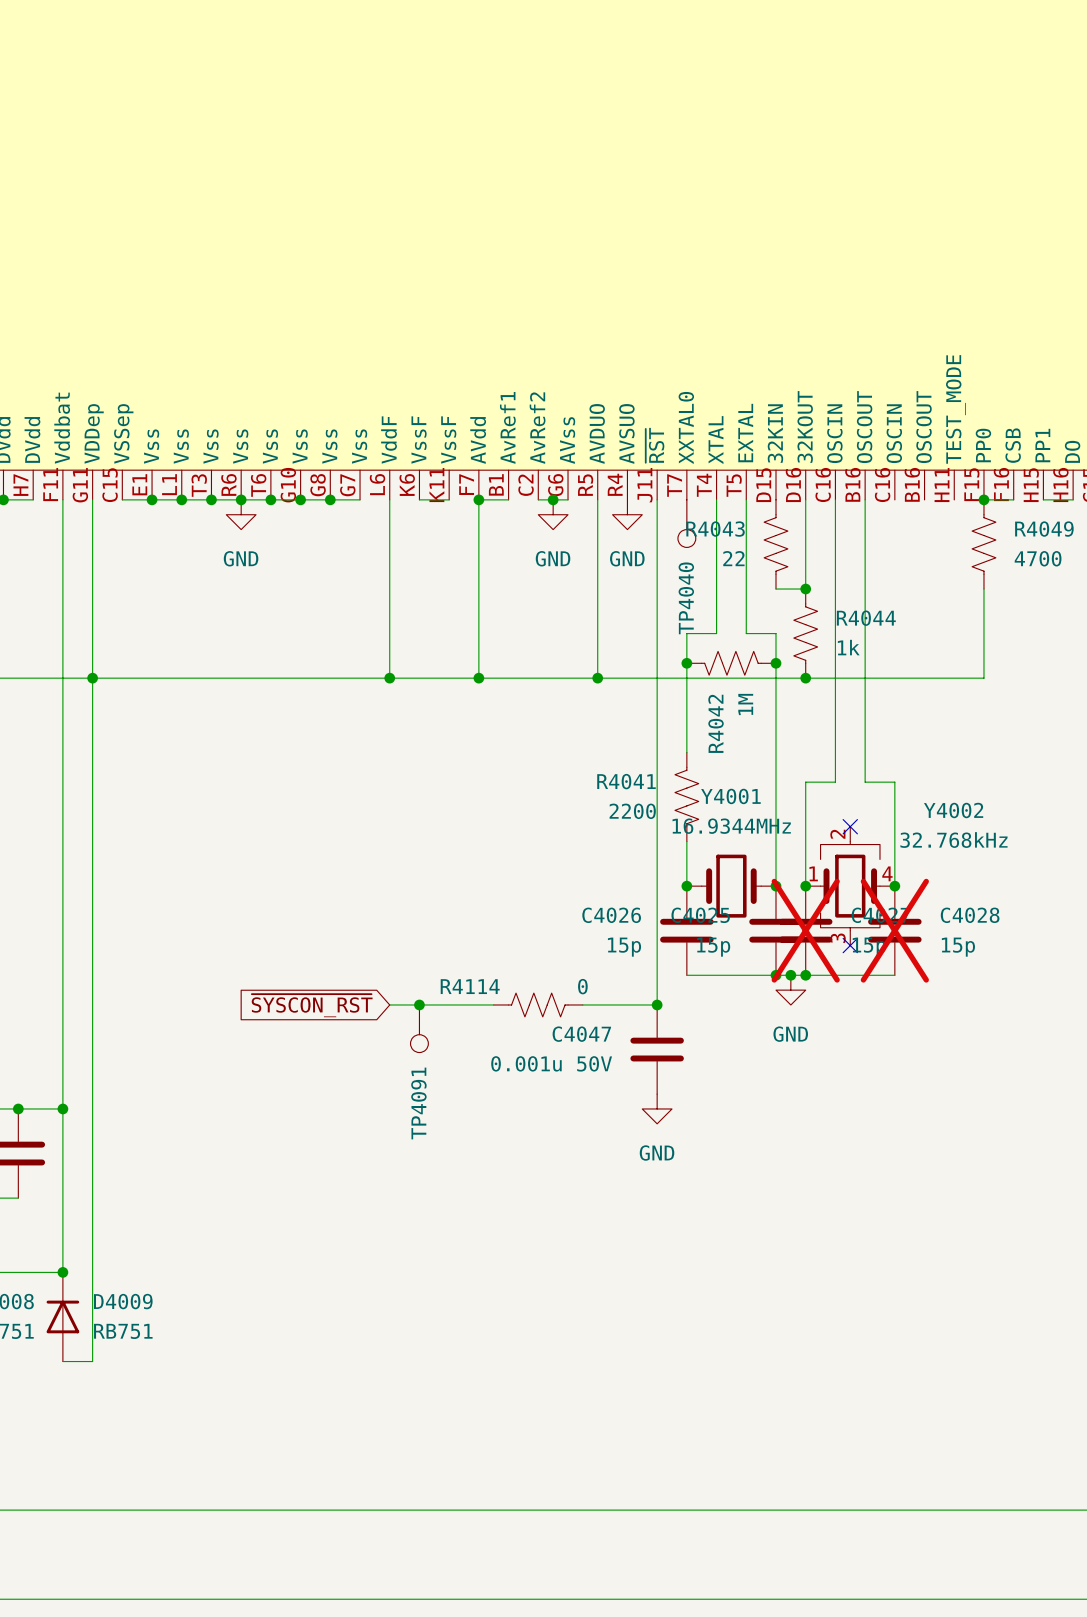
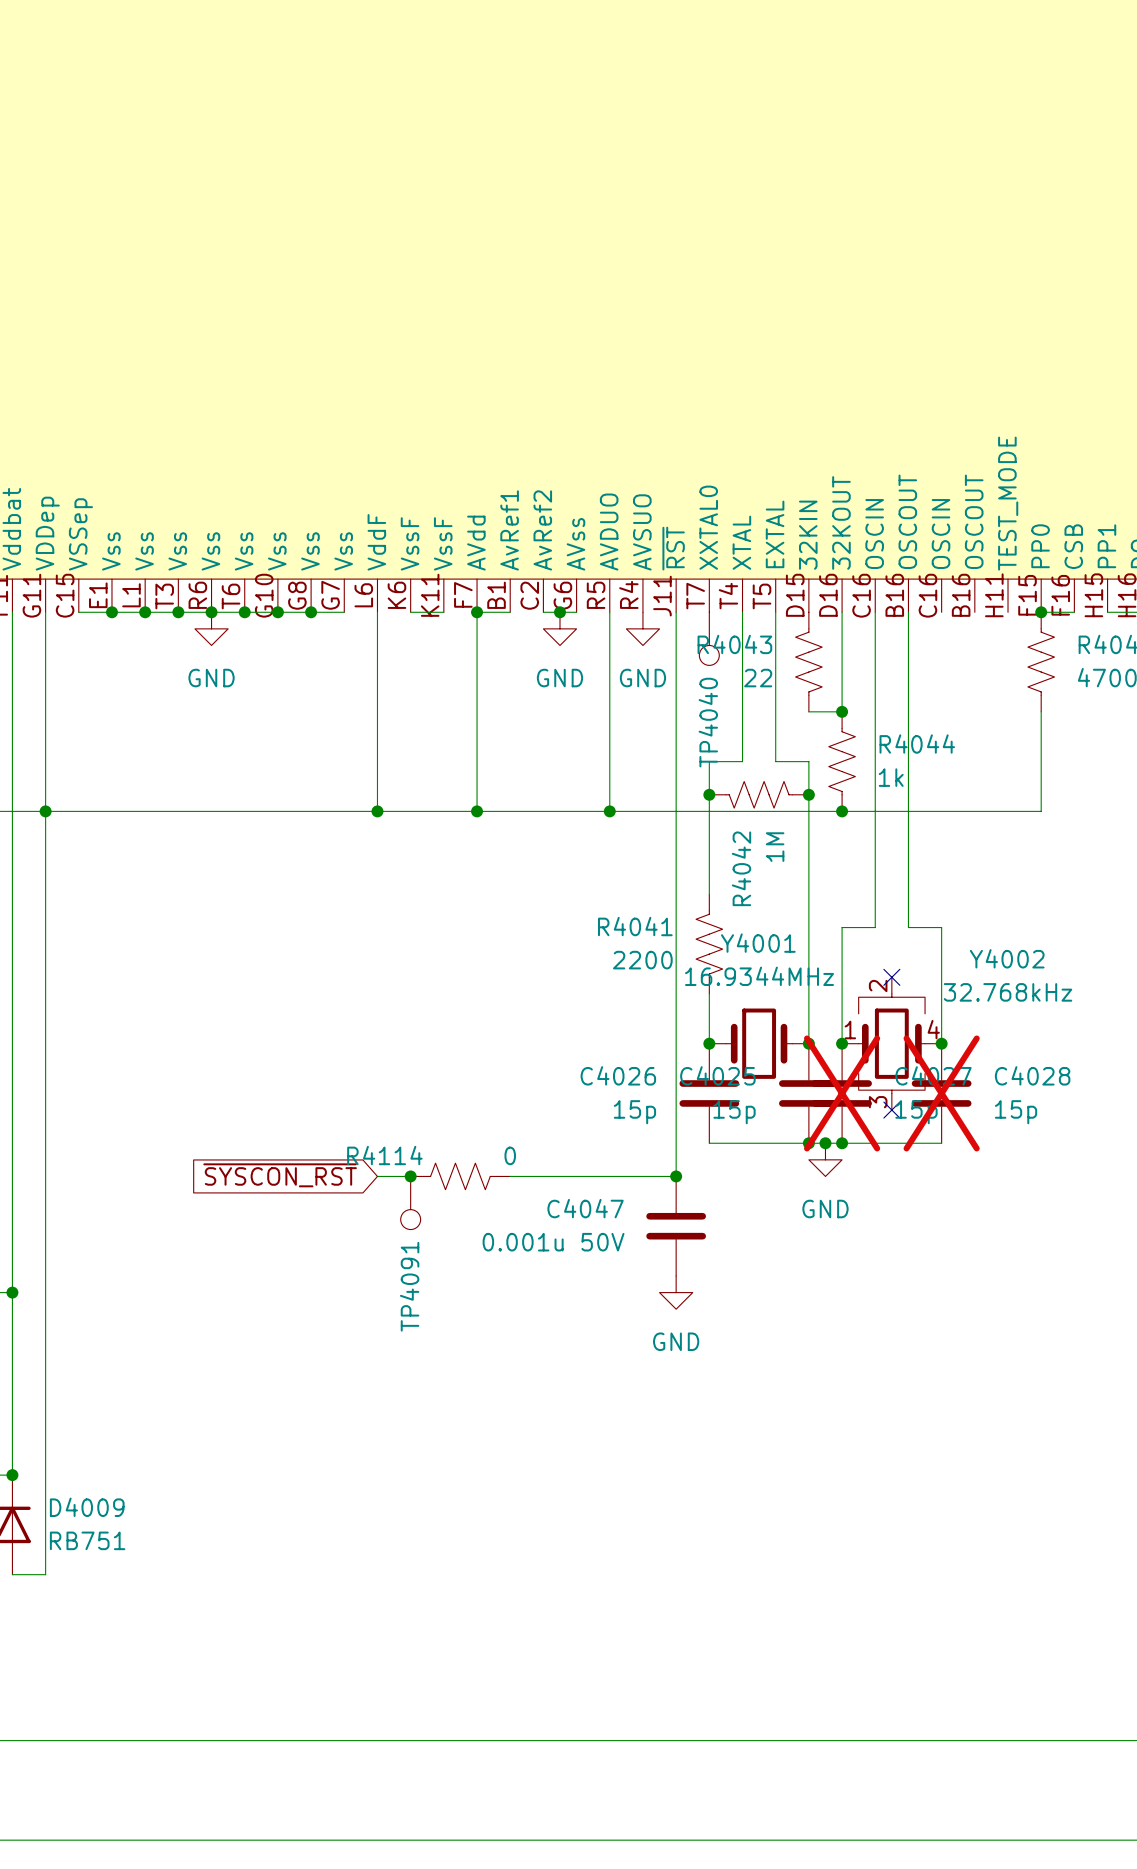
wire: (419, 1004) (493, 1004) -> (510, 1176) (593, 1176)
R4114 position: (538, 1004) -> (460, 1176)

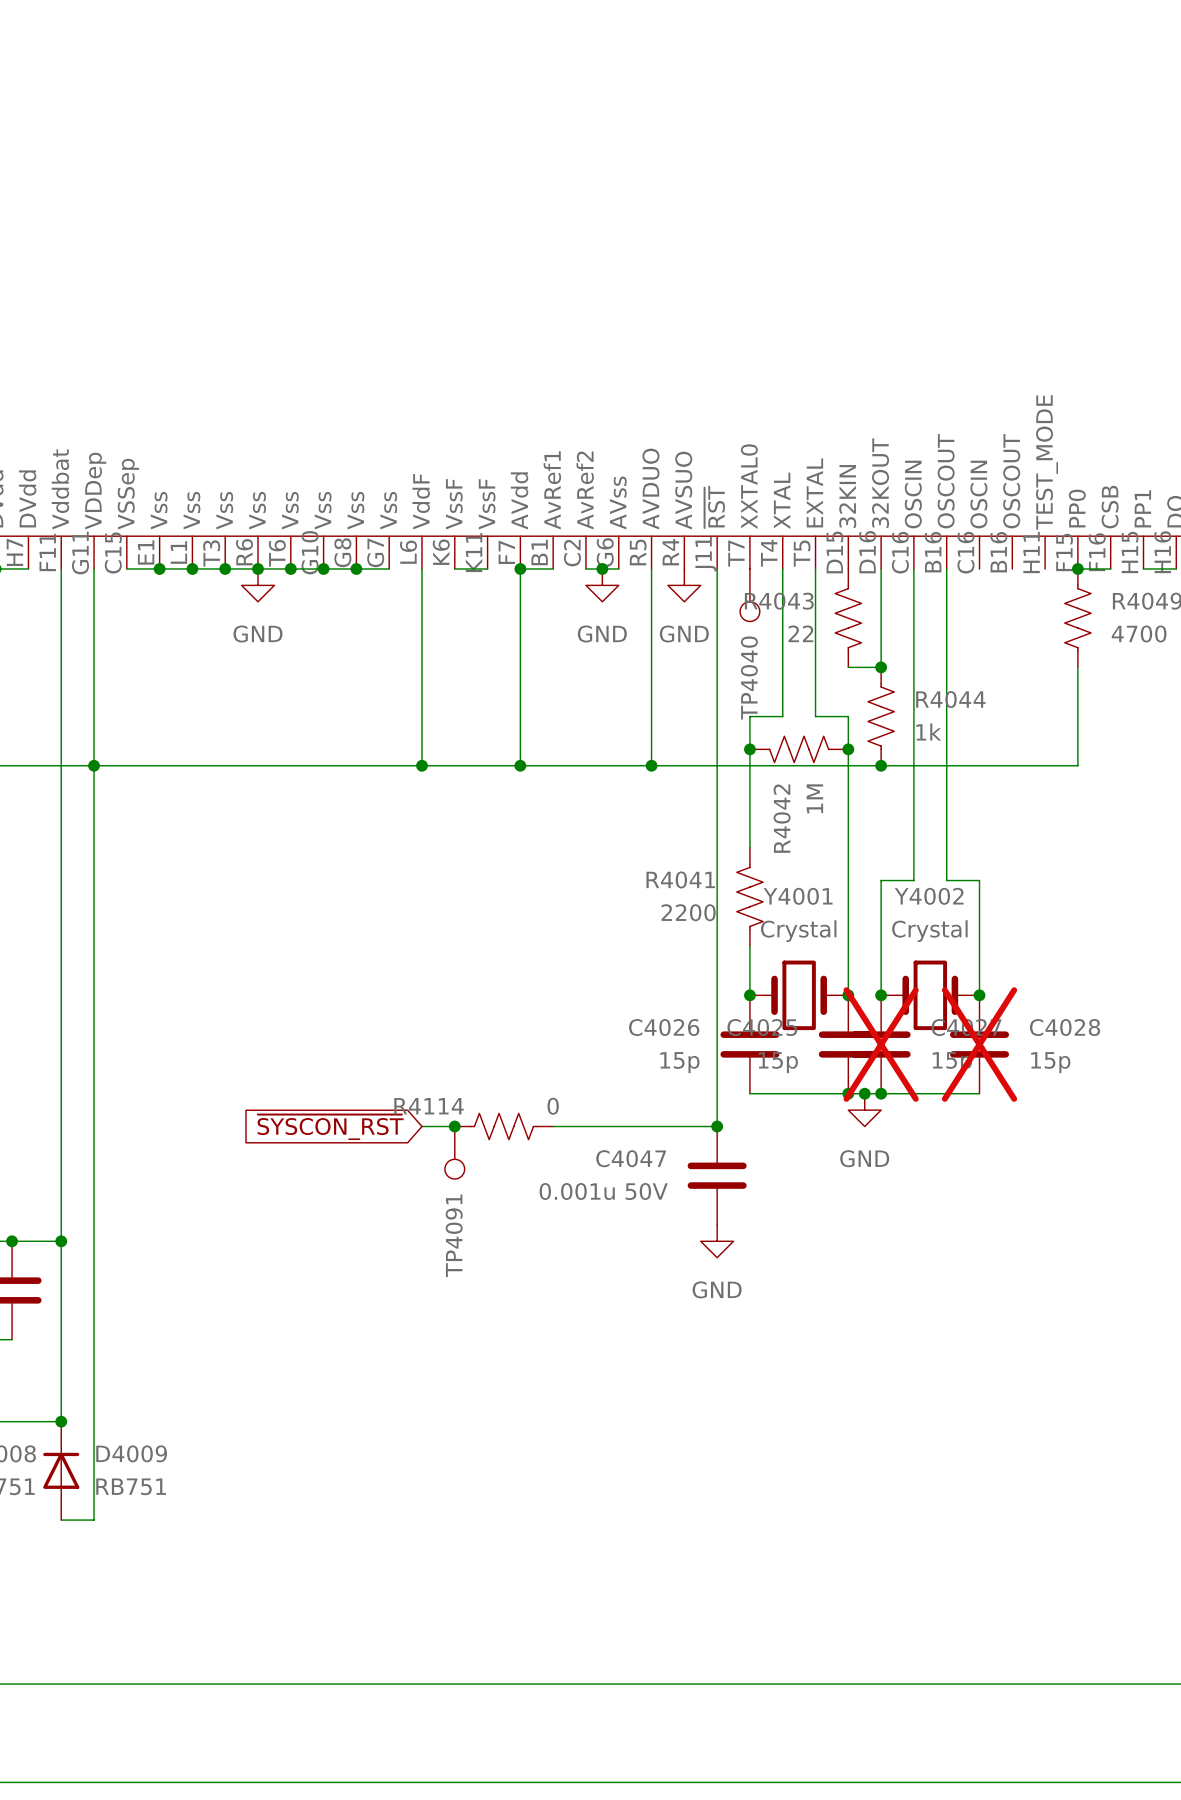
Y4002 name position: Y4002 (1007, 958) -> Y4002 (929, 896)
Y4001 value: 16.9344MHz (759, 976) -> Crystal (798, 931)
Y4002 symbol: [842, 977, 942, 1111] -> [881, 960, 980, 1031]
no-connect mark: (891, 977) -> none
Y4002 value: 32.768kHz (1008, 992) -> Crystal (929, 931)
no-connect mark: (891, 1110) -> none

